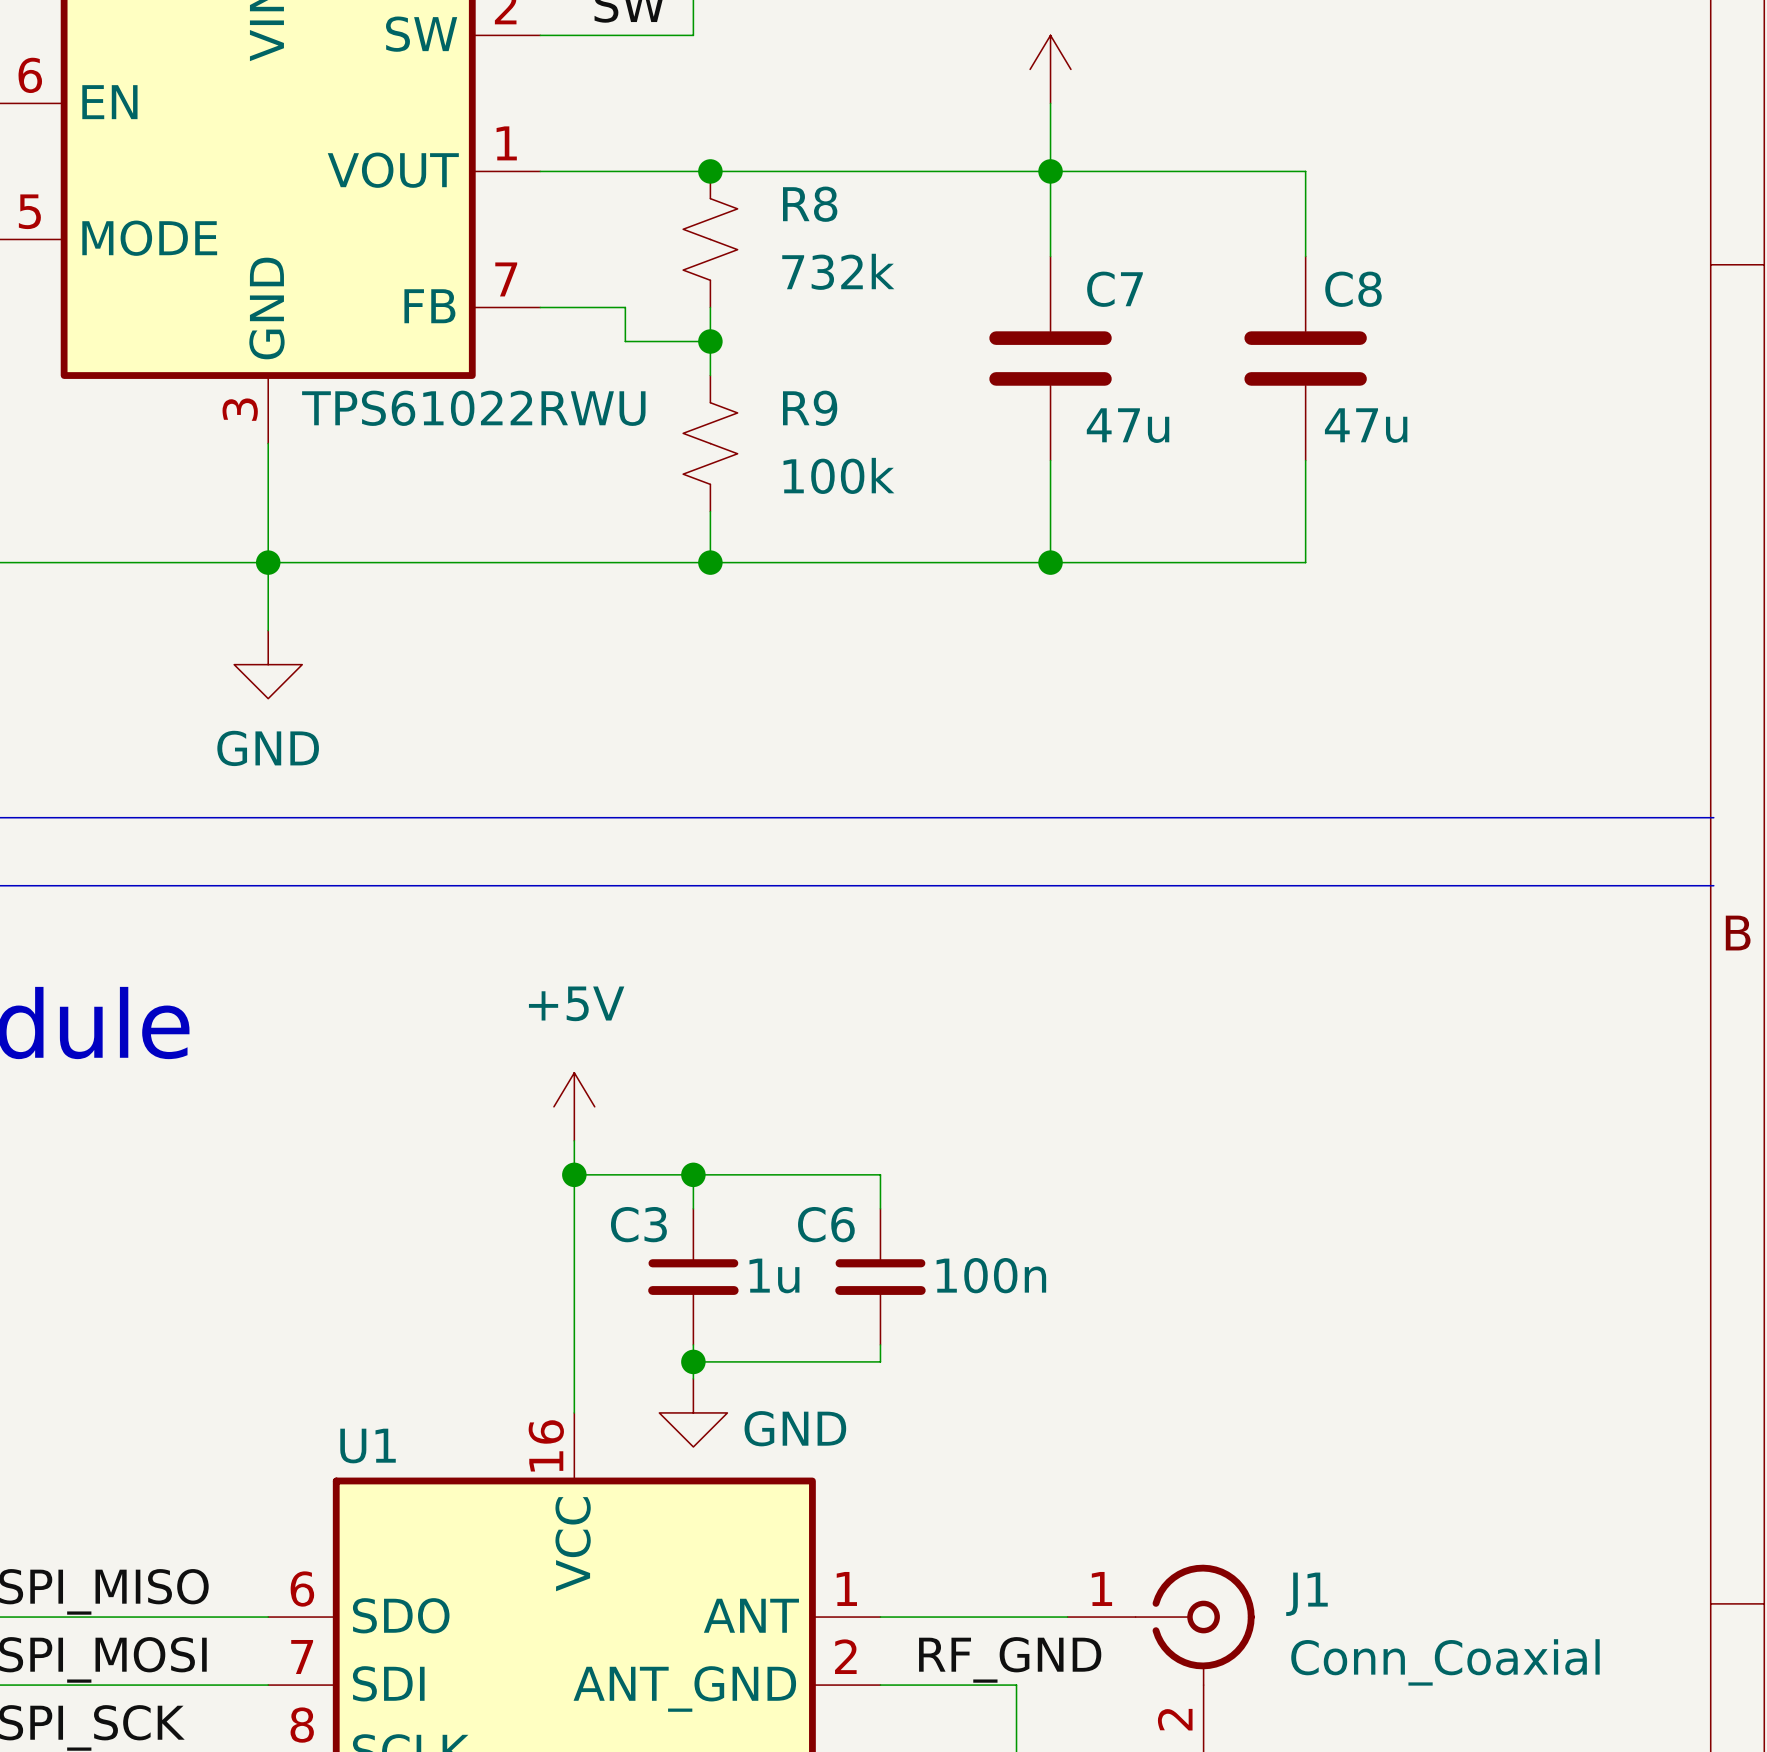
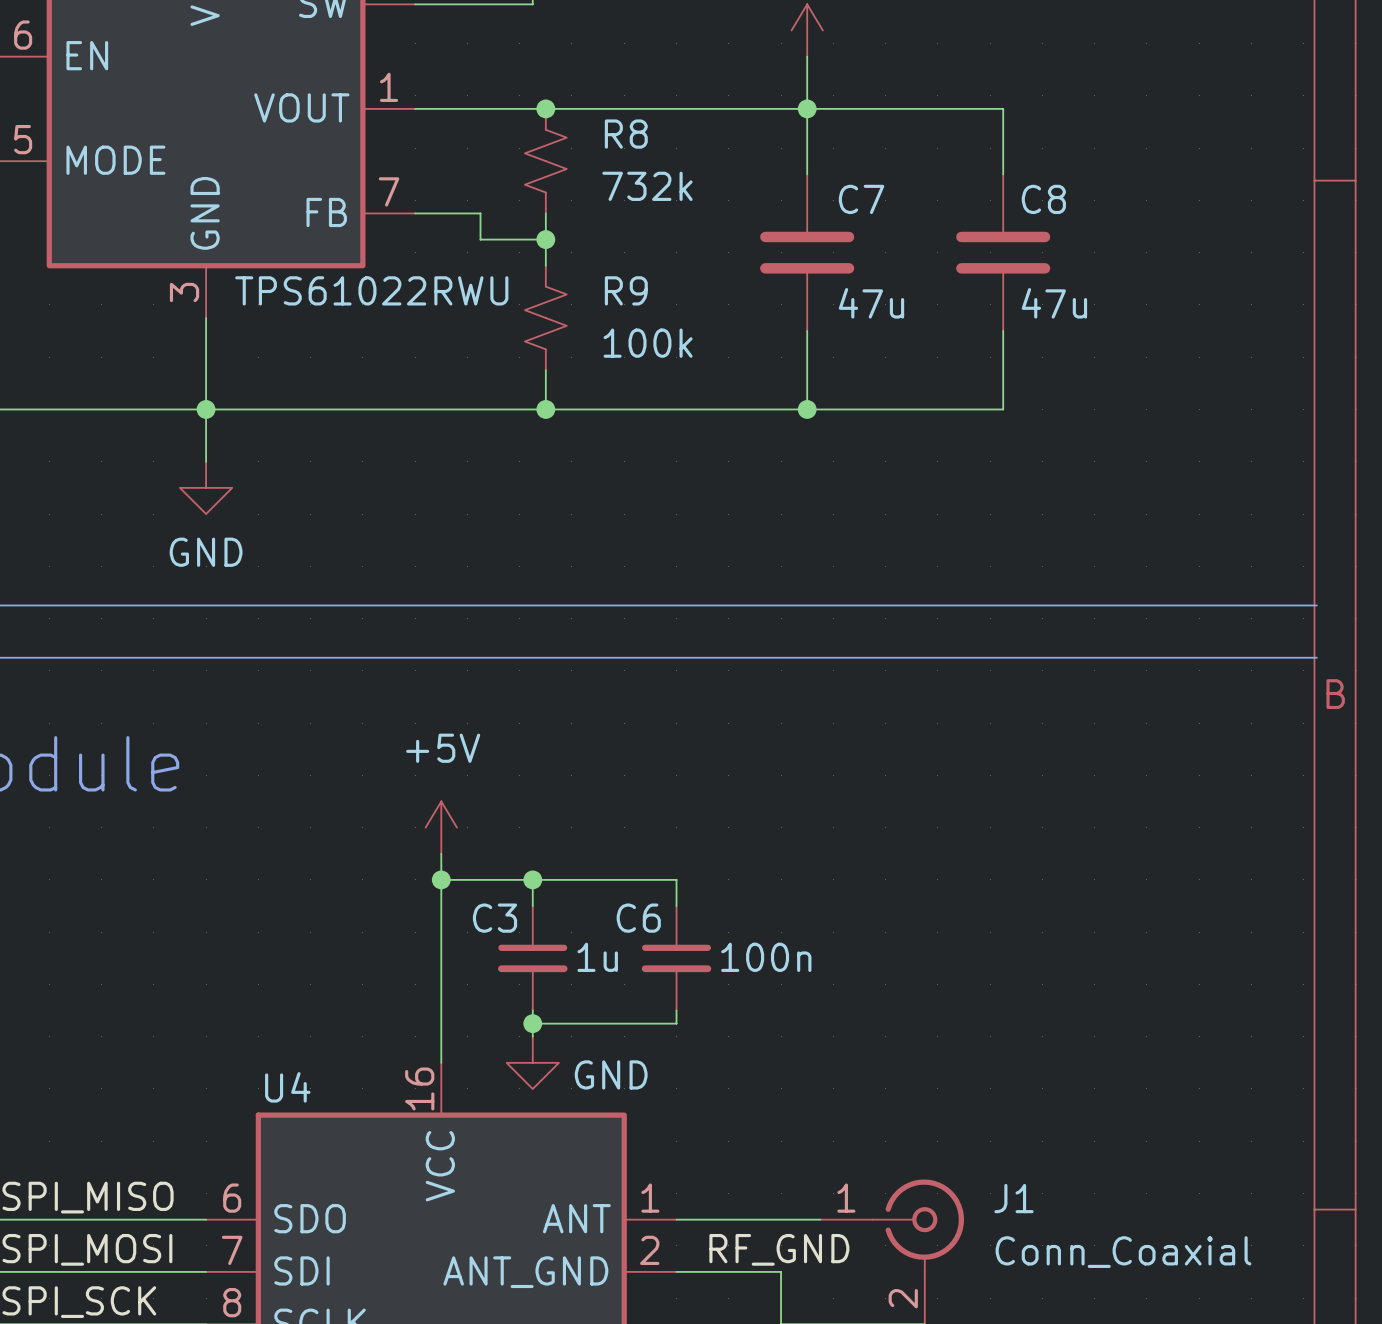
U1 name: U1 (368, 1446) -> U4 (287, 1087)

